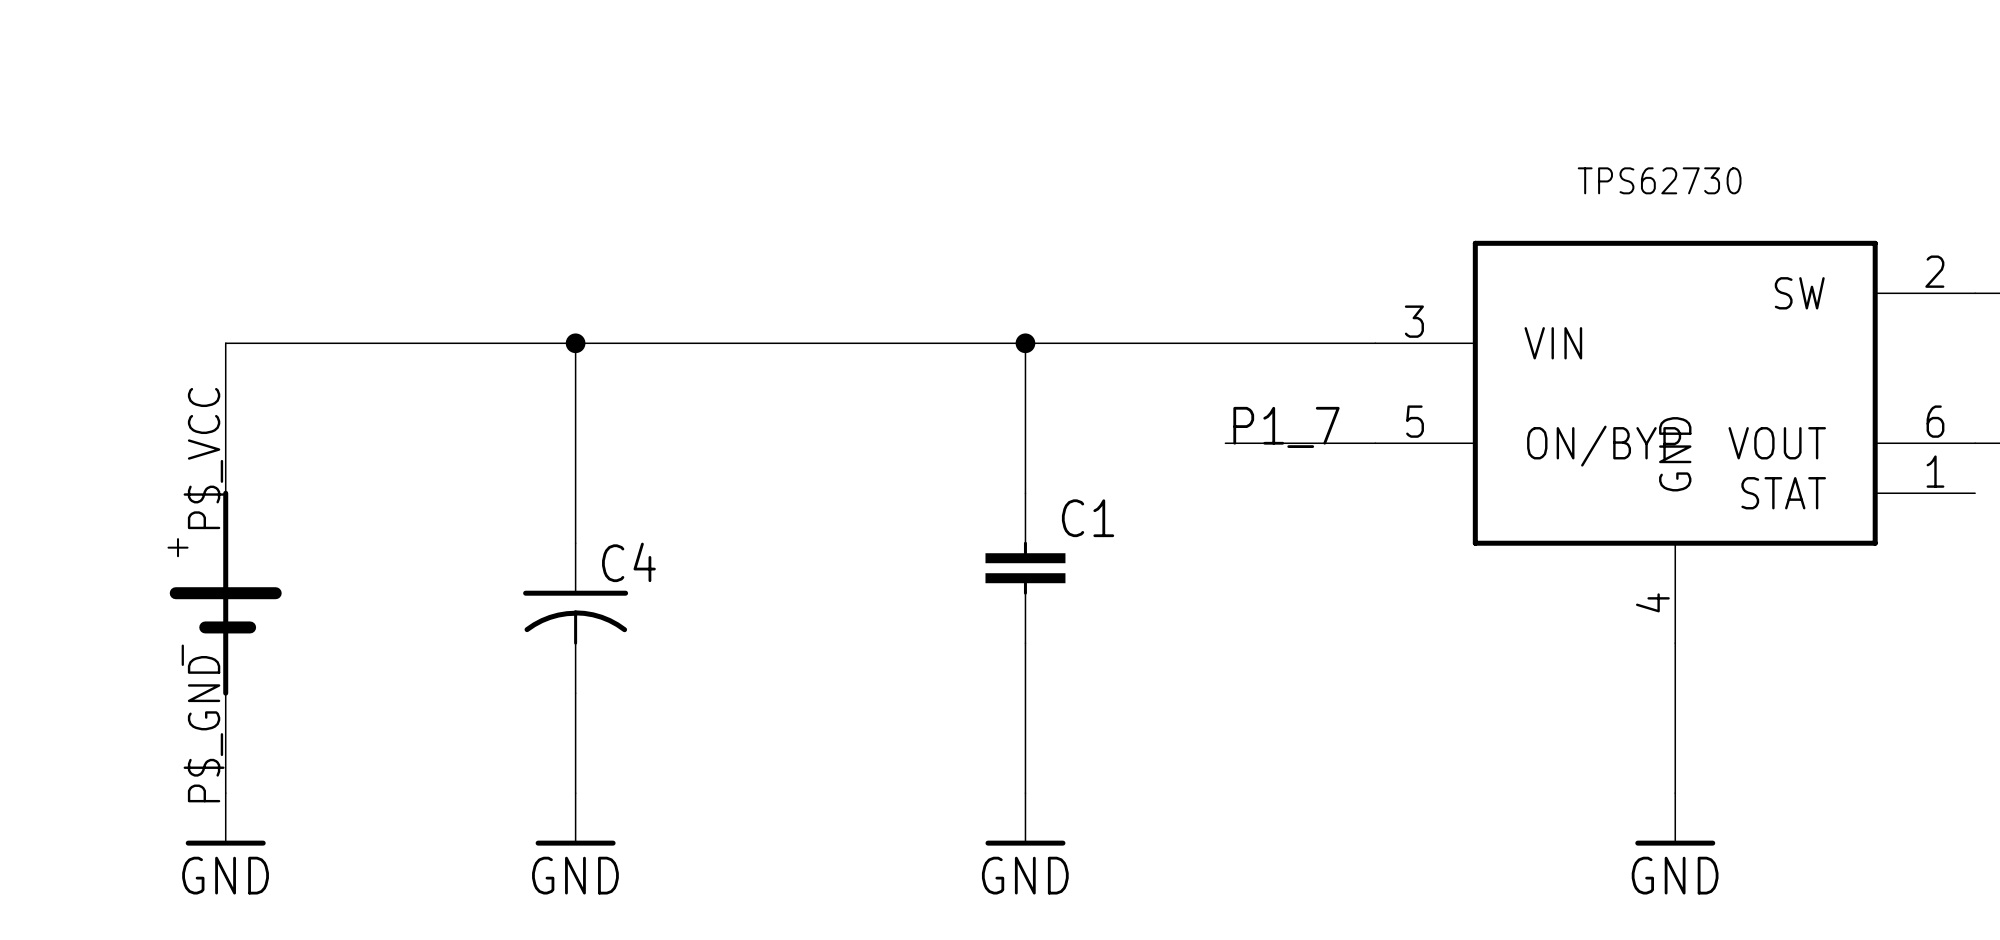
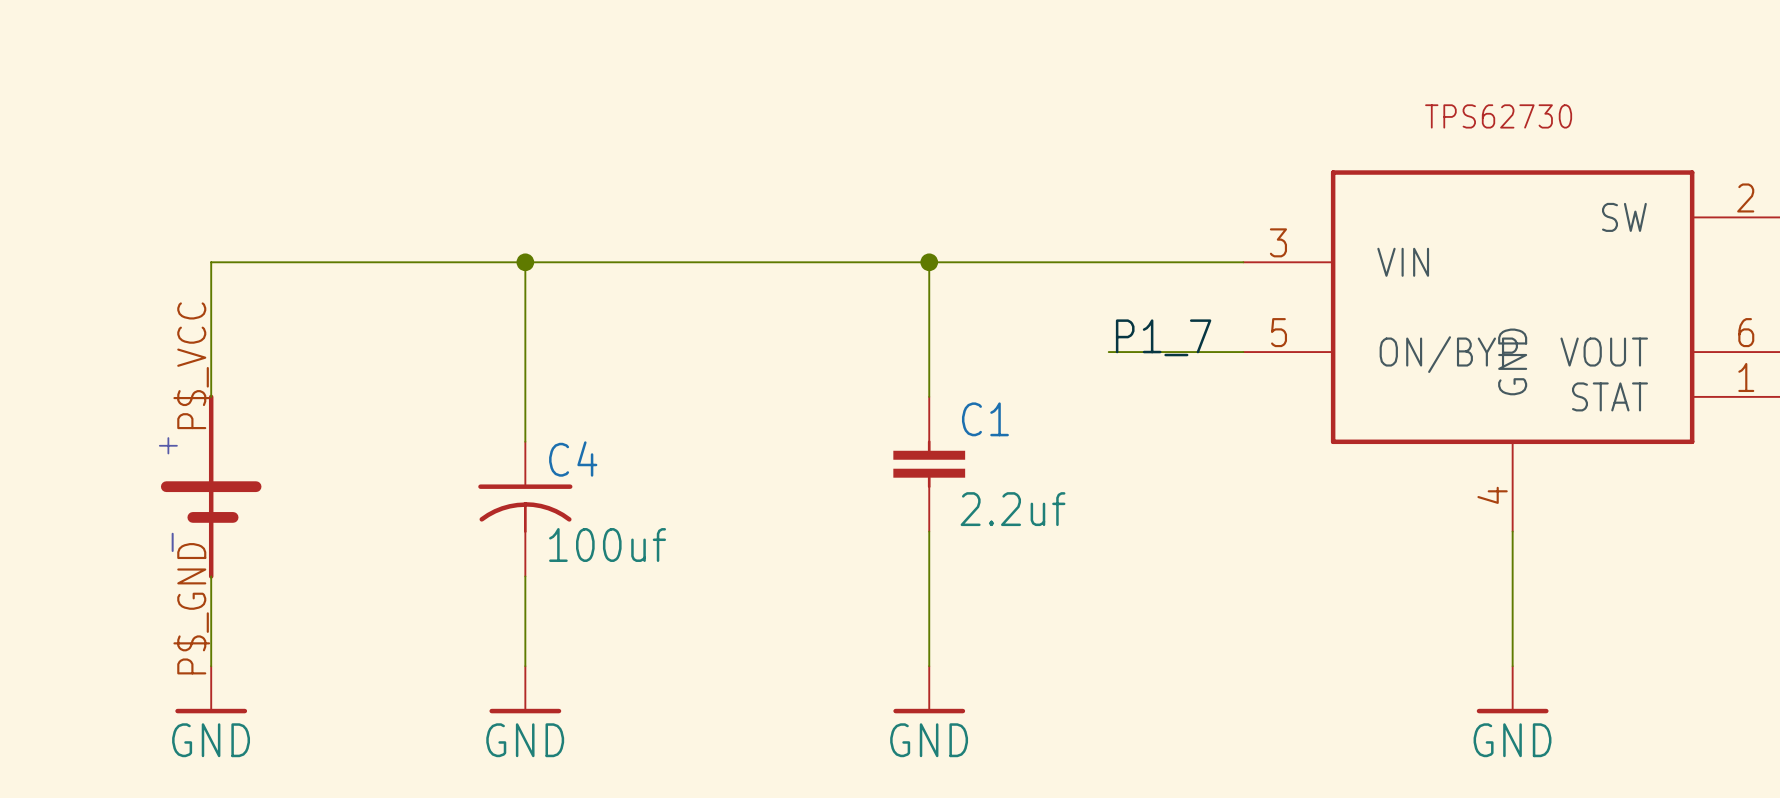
C1 value: none -> 2.2uf (1013, 509)
C4 value: none -> 100uf (607, 545)

